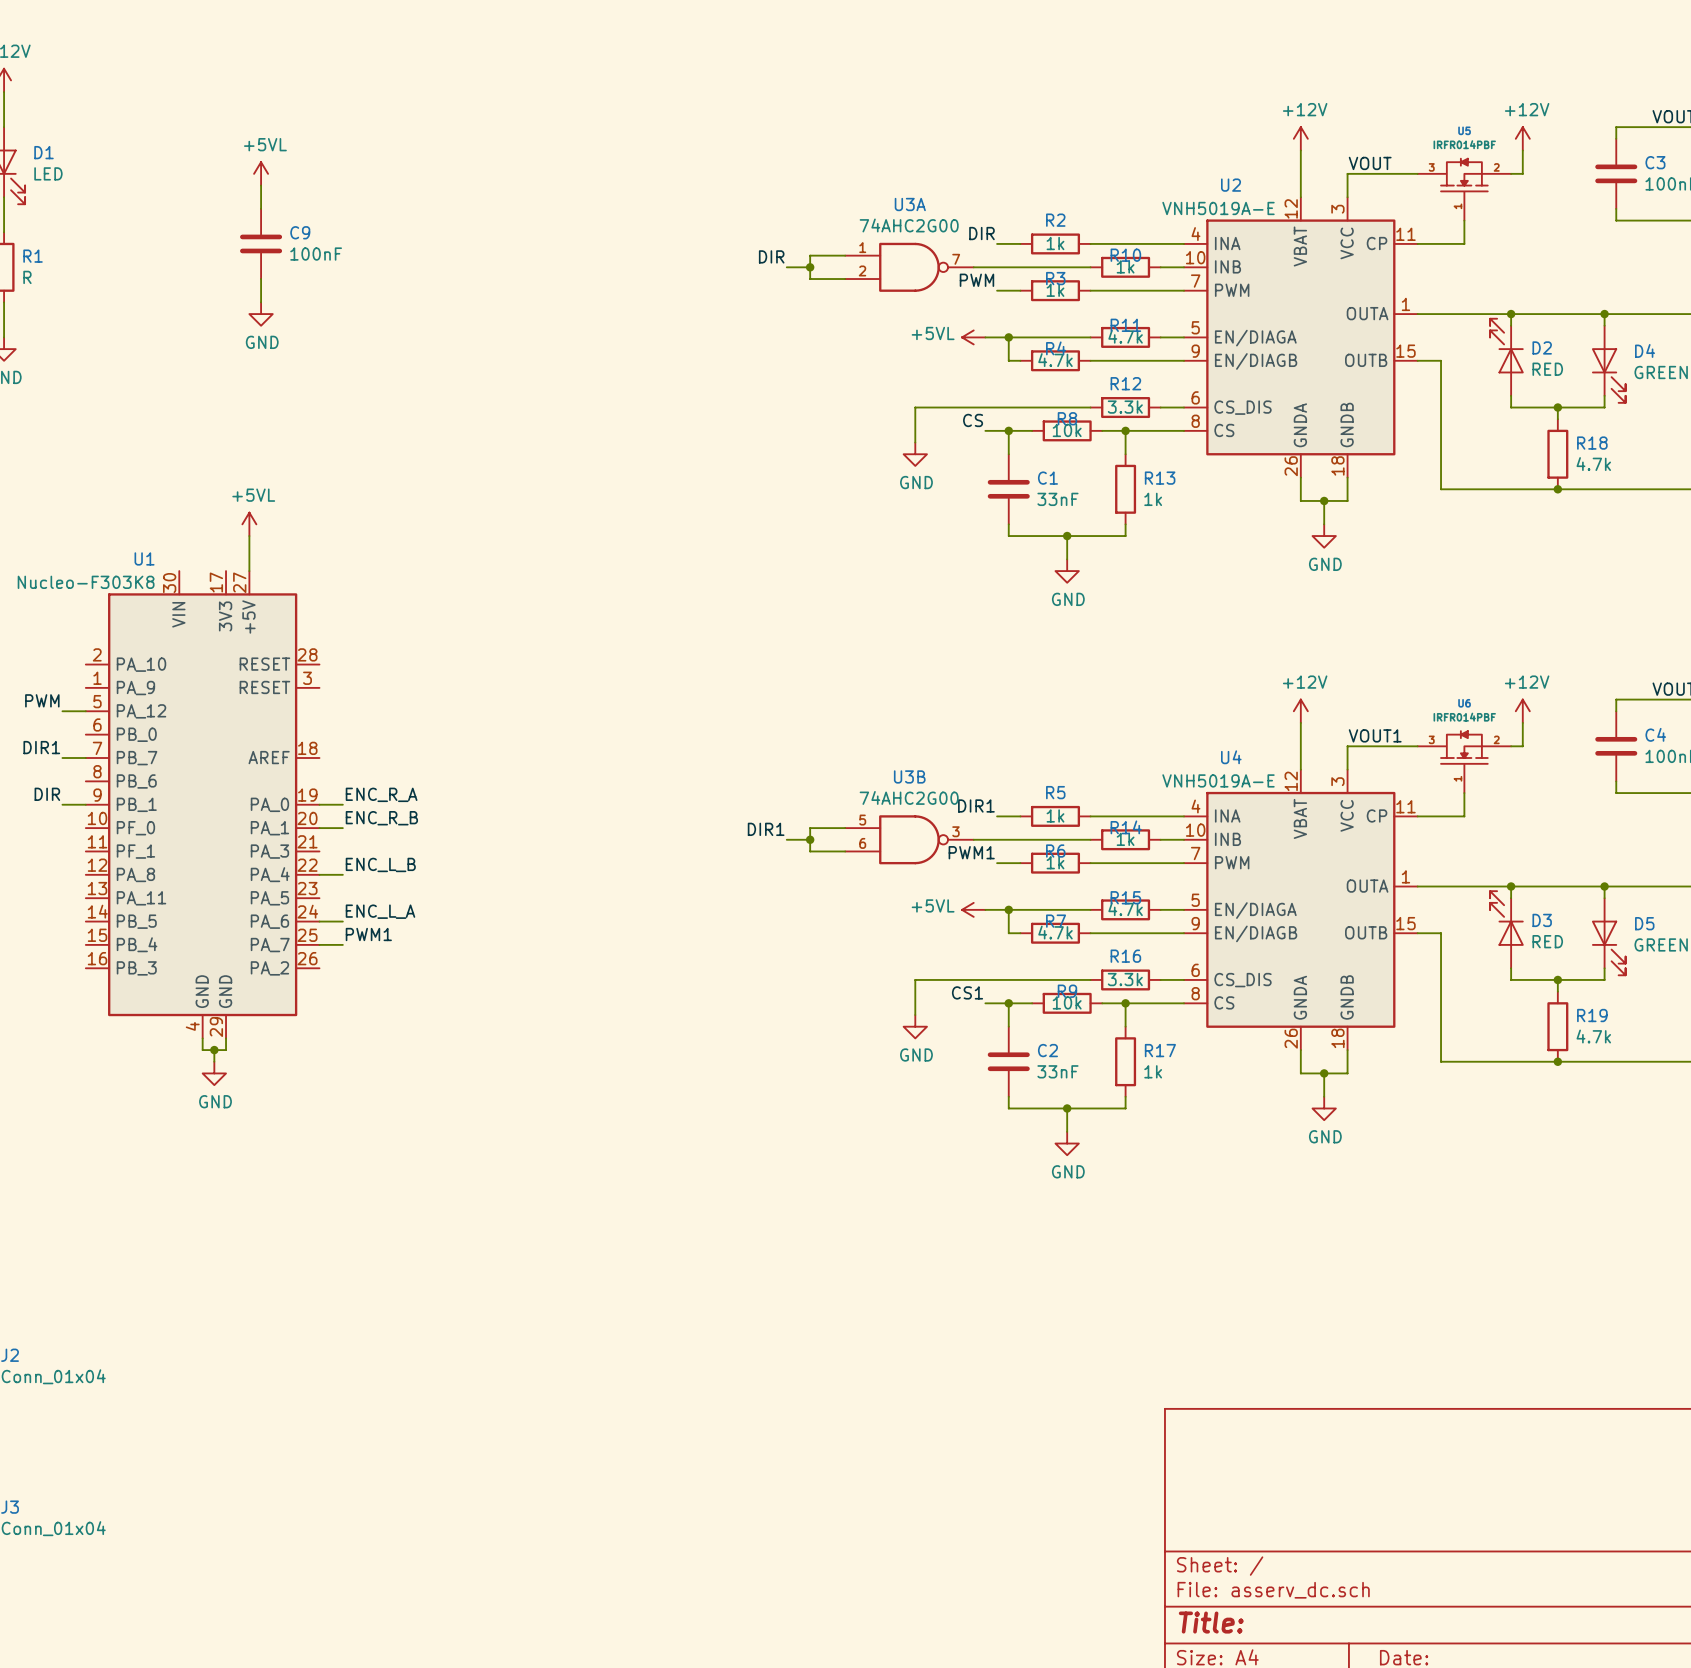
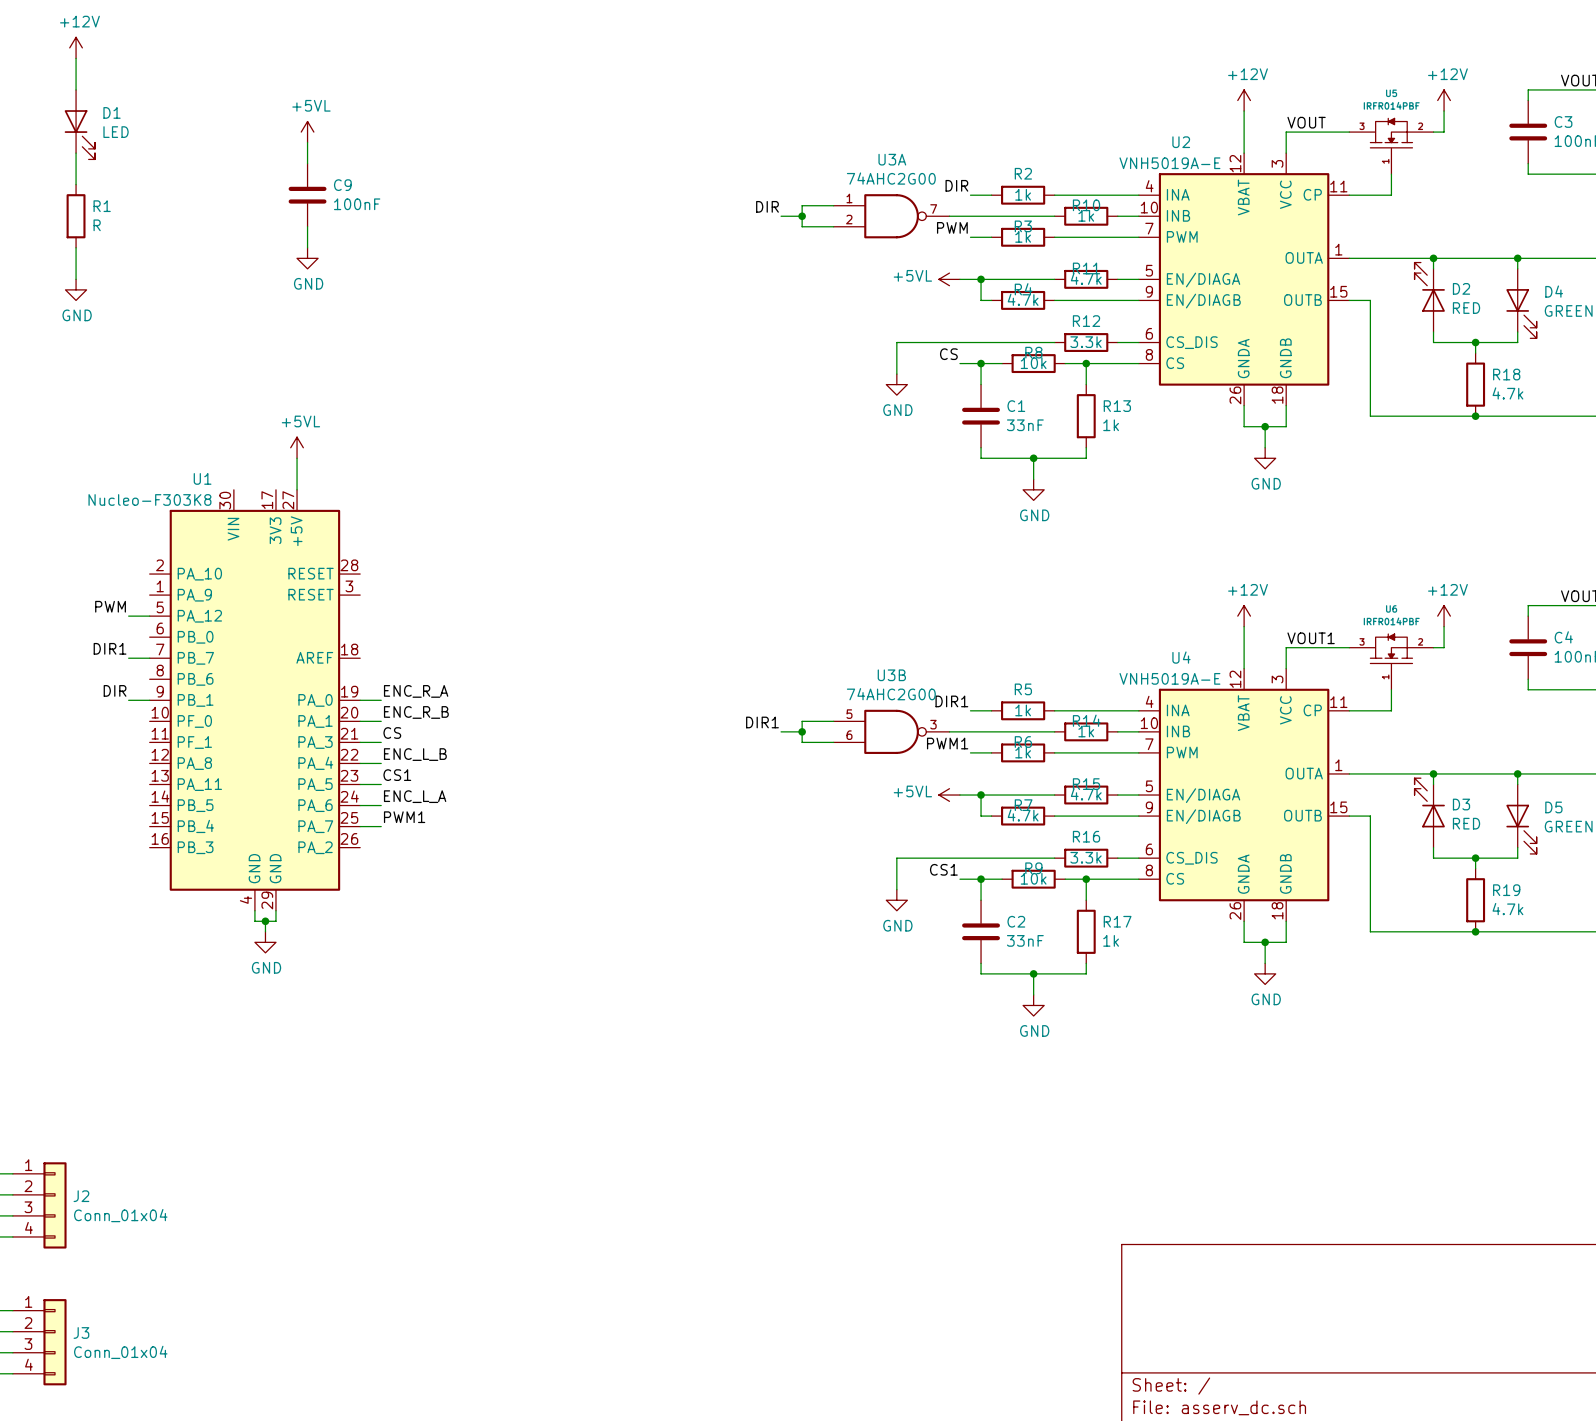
label: none -> CS (392, 733)
wire: none -> (360, 742) (381, 742)
label: none -> CS1 (397, 775)
wire: none -> (360, 784) (381, 784)

